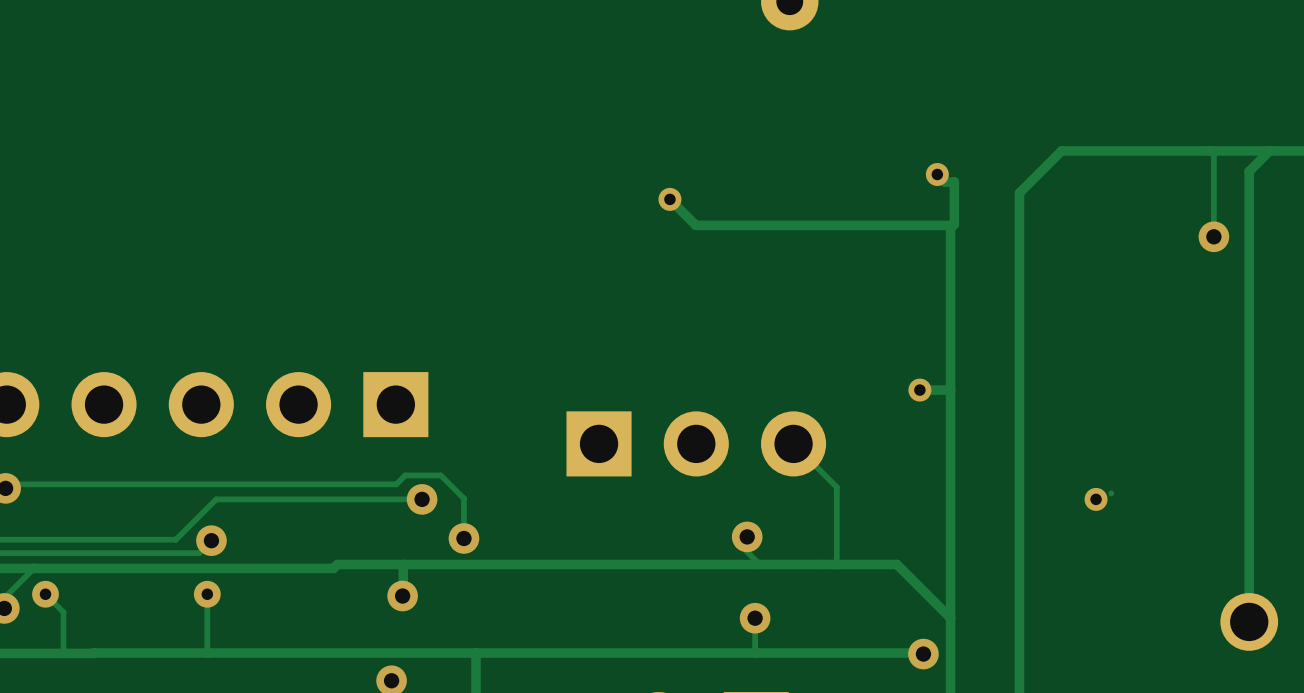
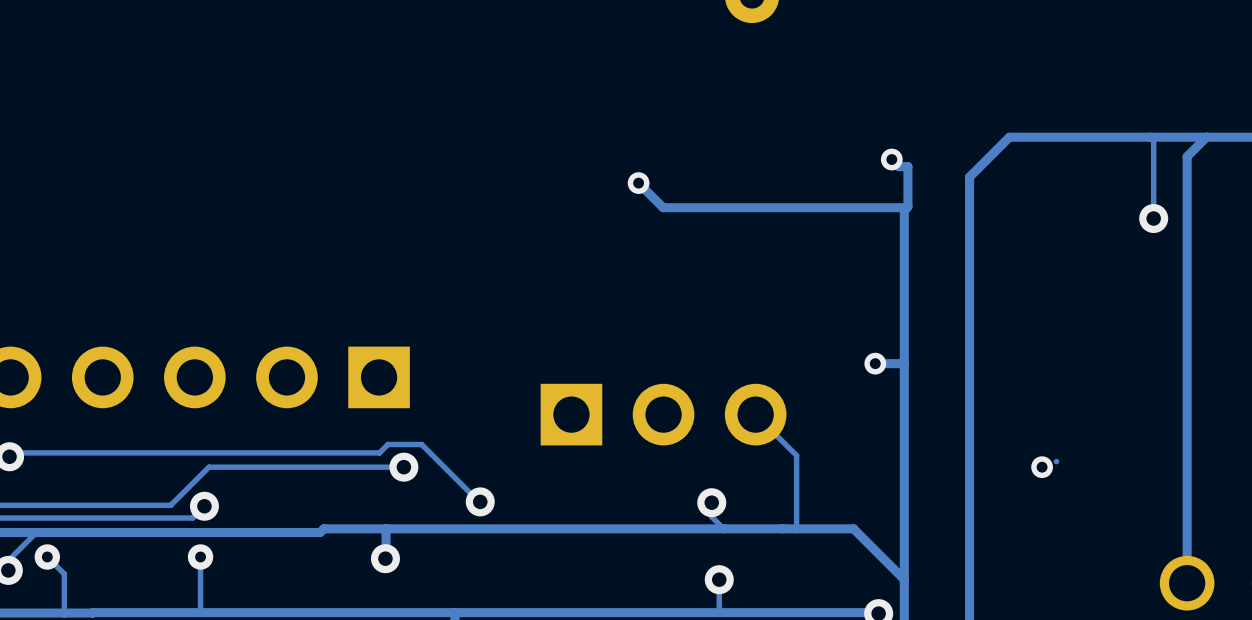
track: (463, 498) (463, 538) -> (443, 466) (480, 501)
via position: (463, 538) -> (480, 501)

